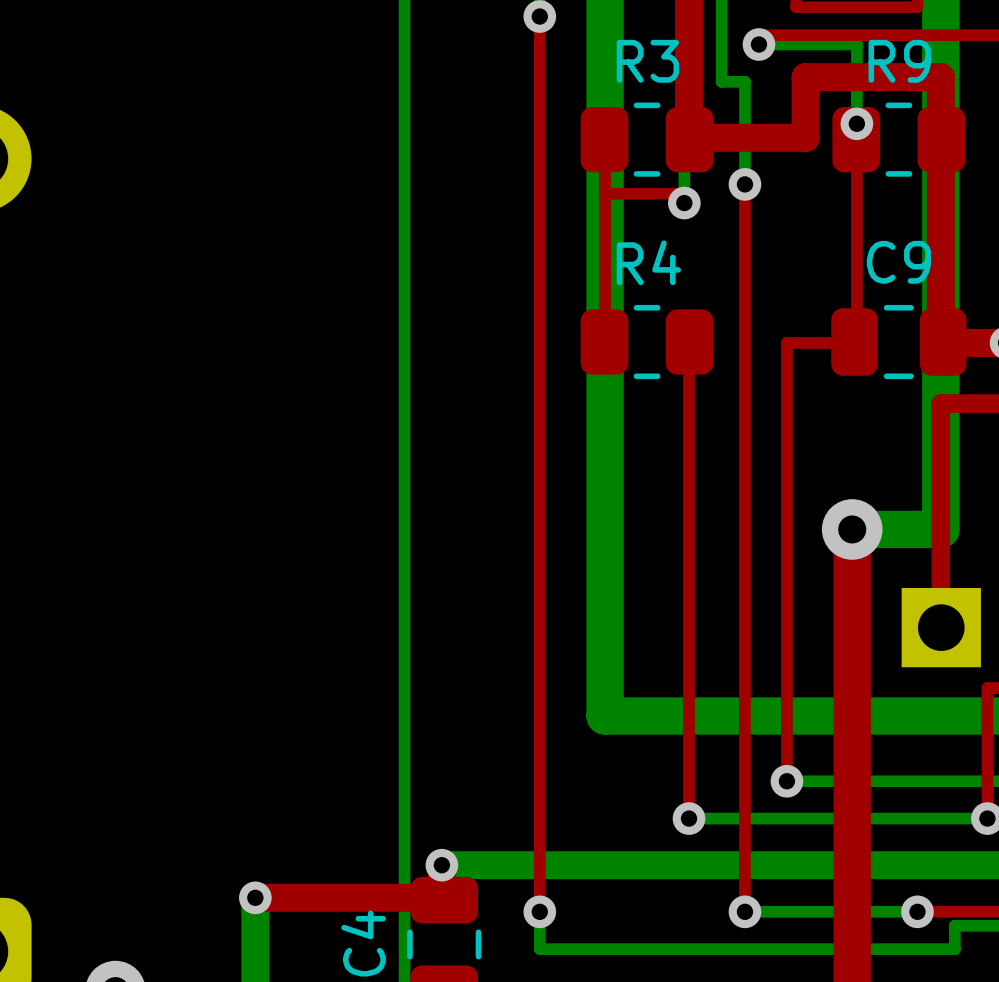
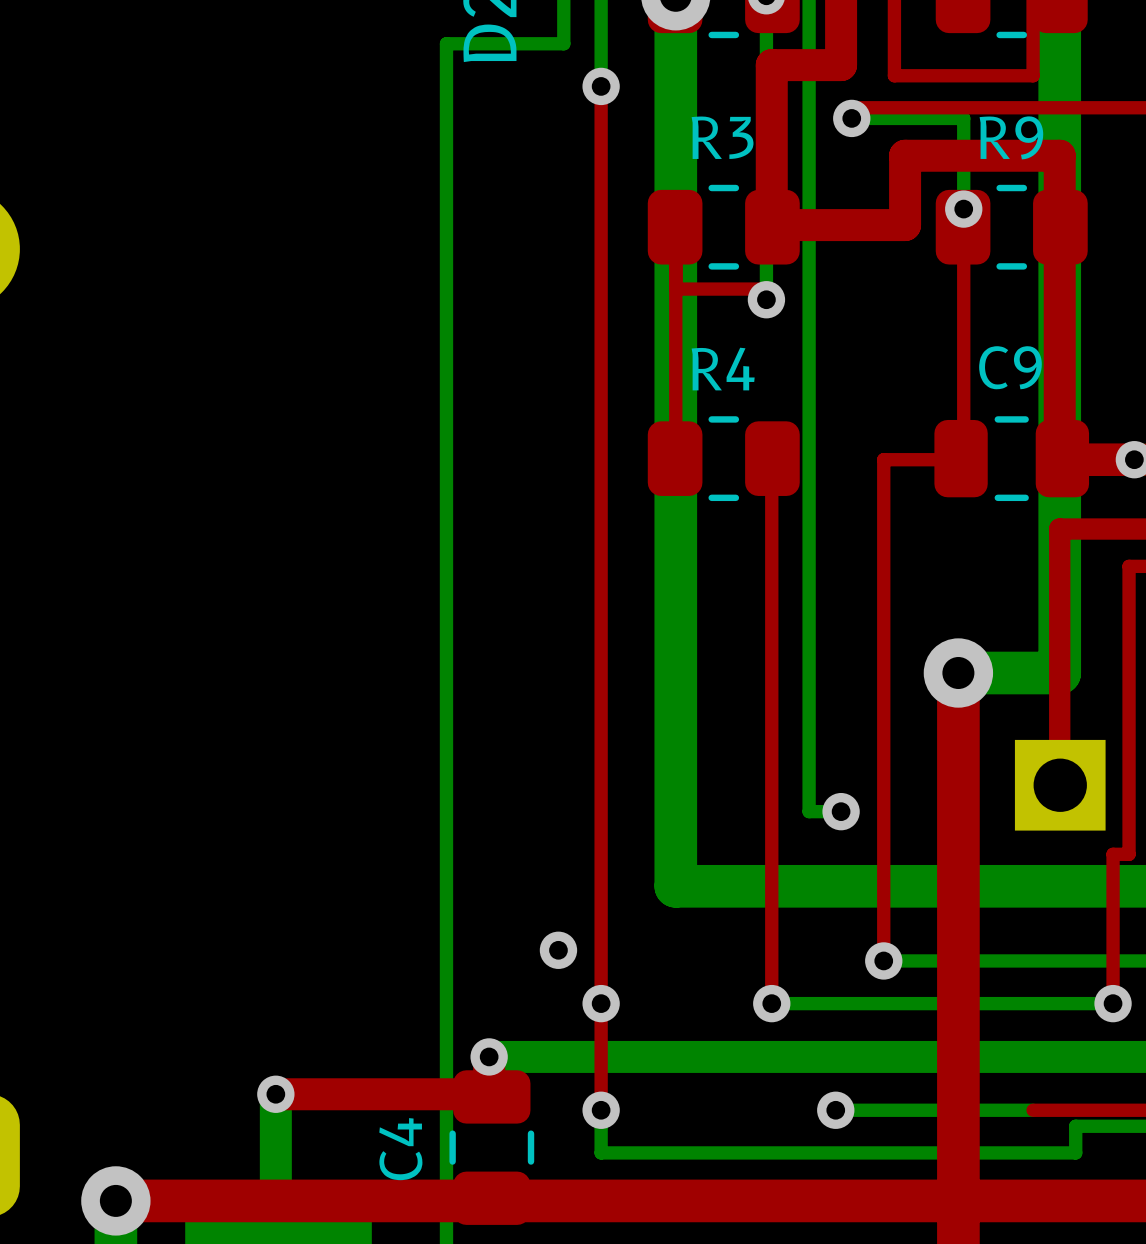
bottom track: (721, 81) (744, 81) (744, 184) -> (809, 161) (809, 811) (841, 811)
top track: (744, 184) (744, 911) -> none
via: (744, 184) -> none
via: none -> (841, 811)
via: none -> (558, 950)
via: none -> (601, 1003)
via: (917, 911) -> none

